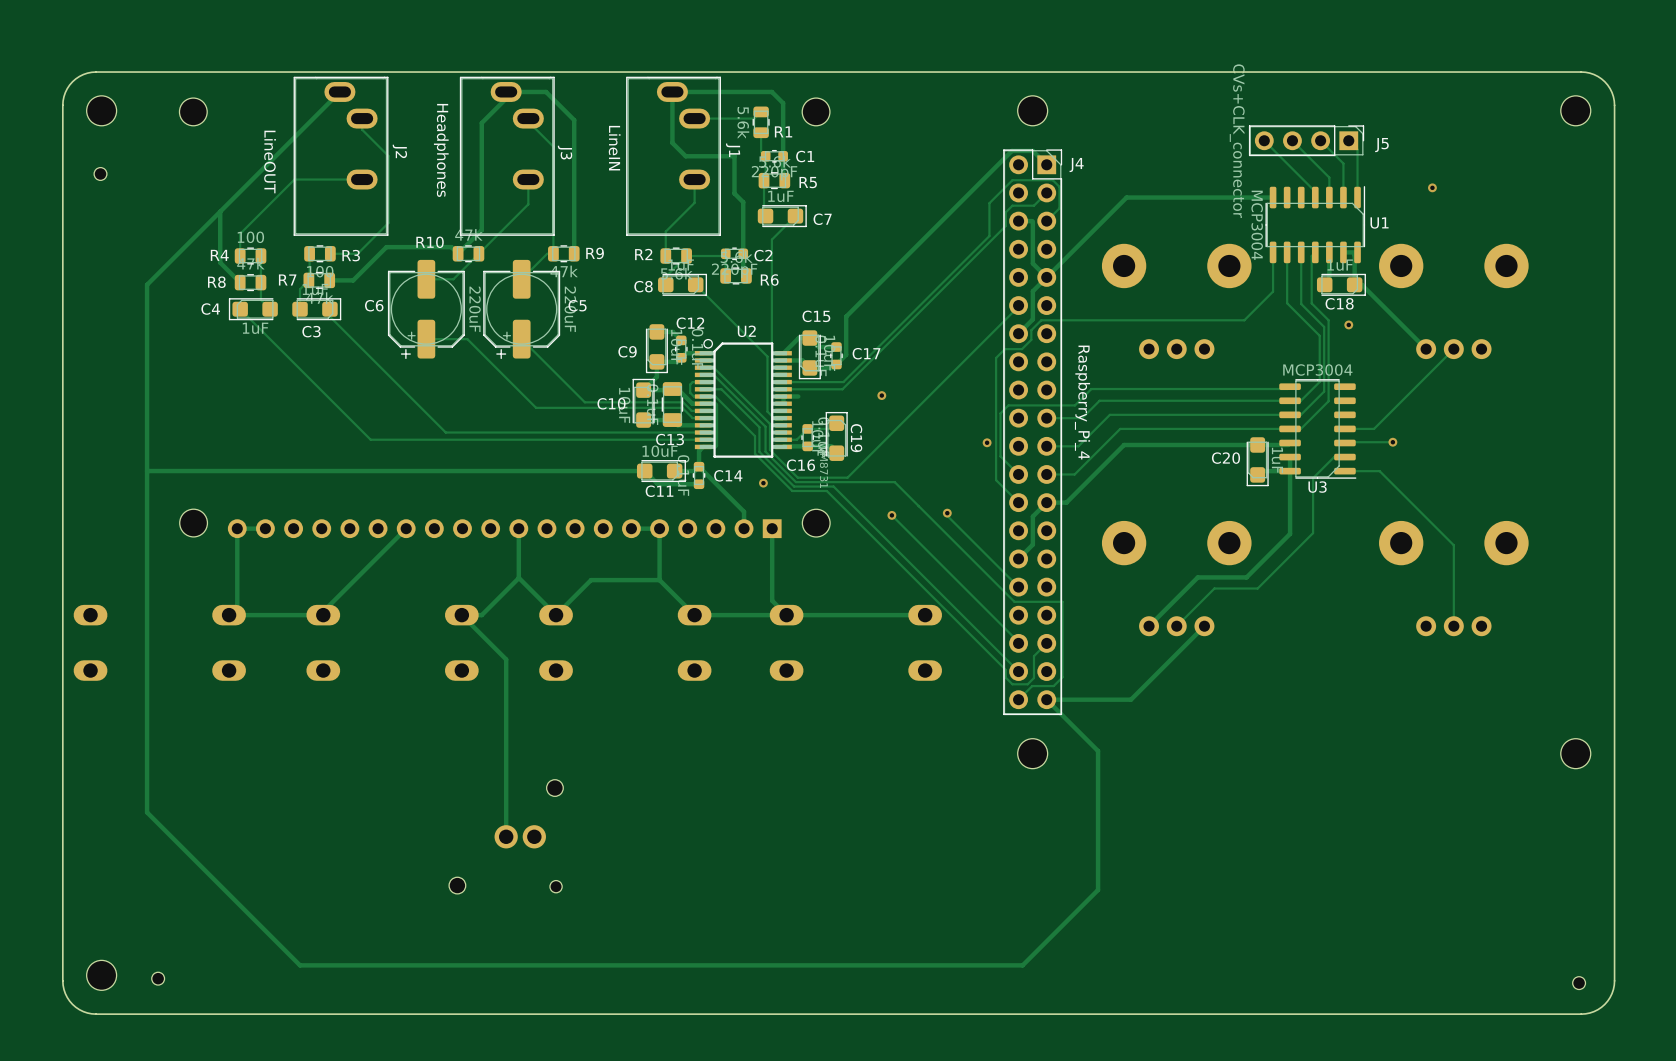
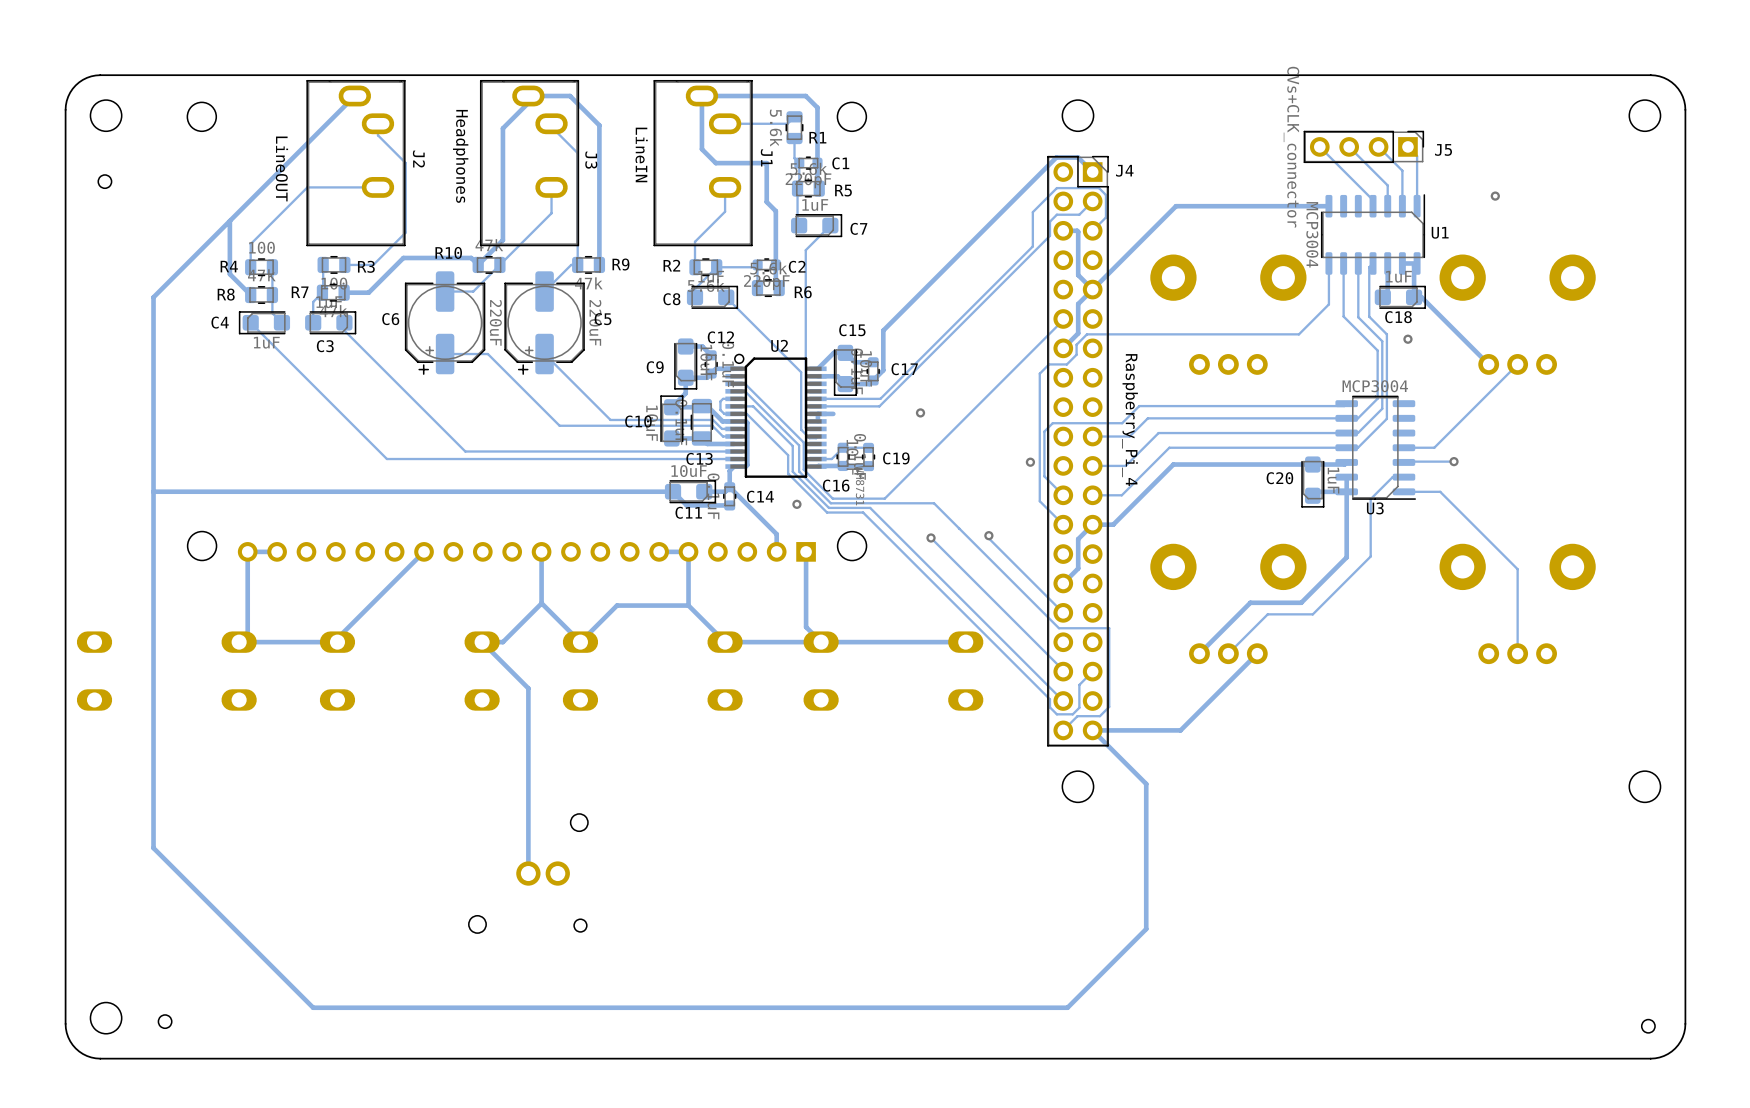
C19 footprint: [825, 411, 848, 461] -> [861, 442, 876, 472]

